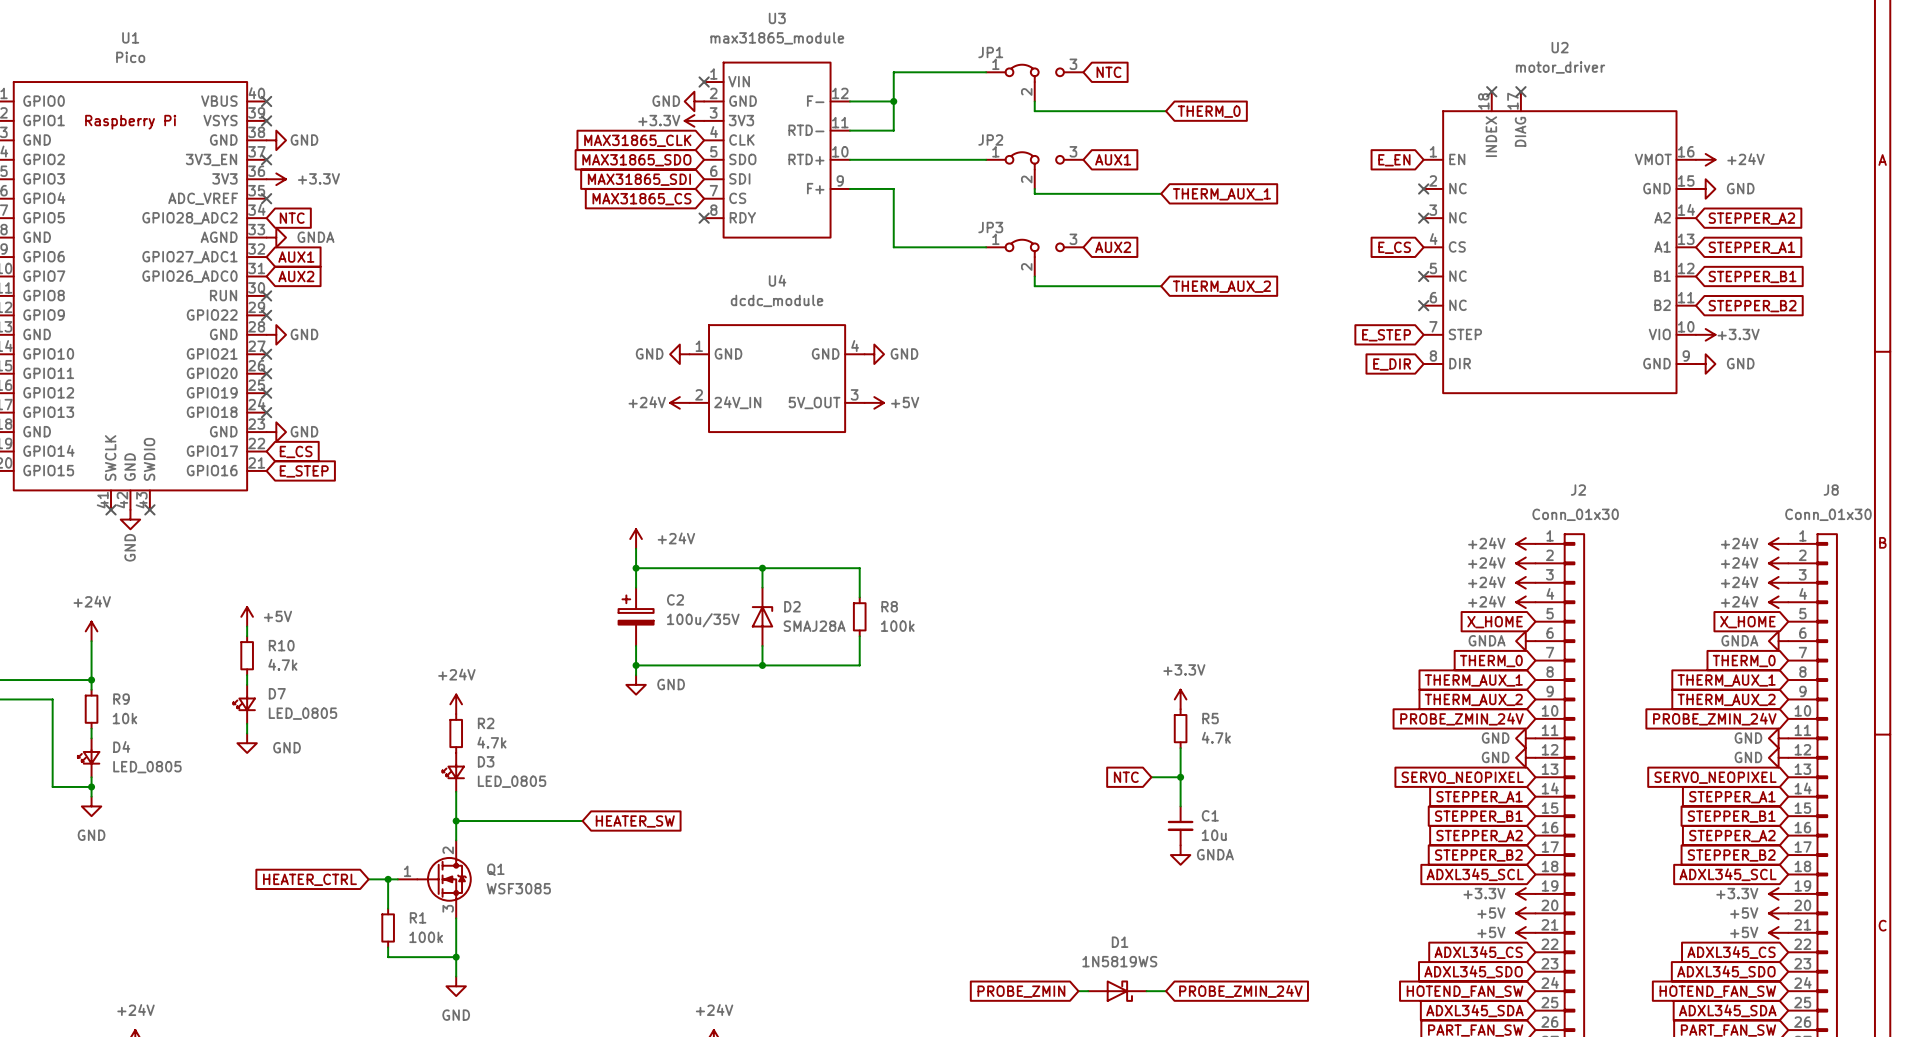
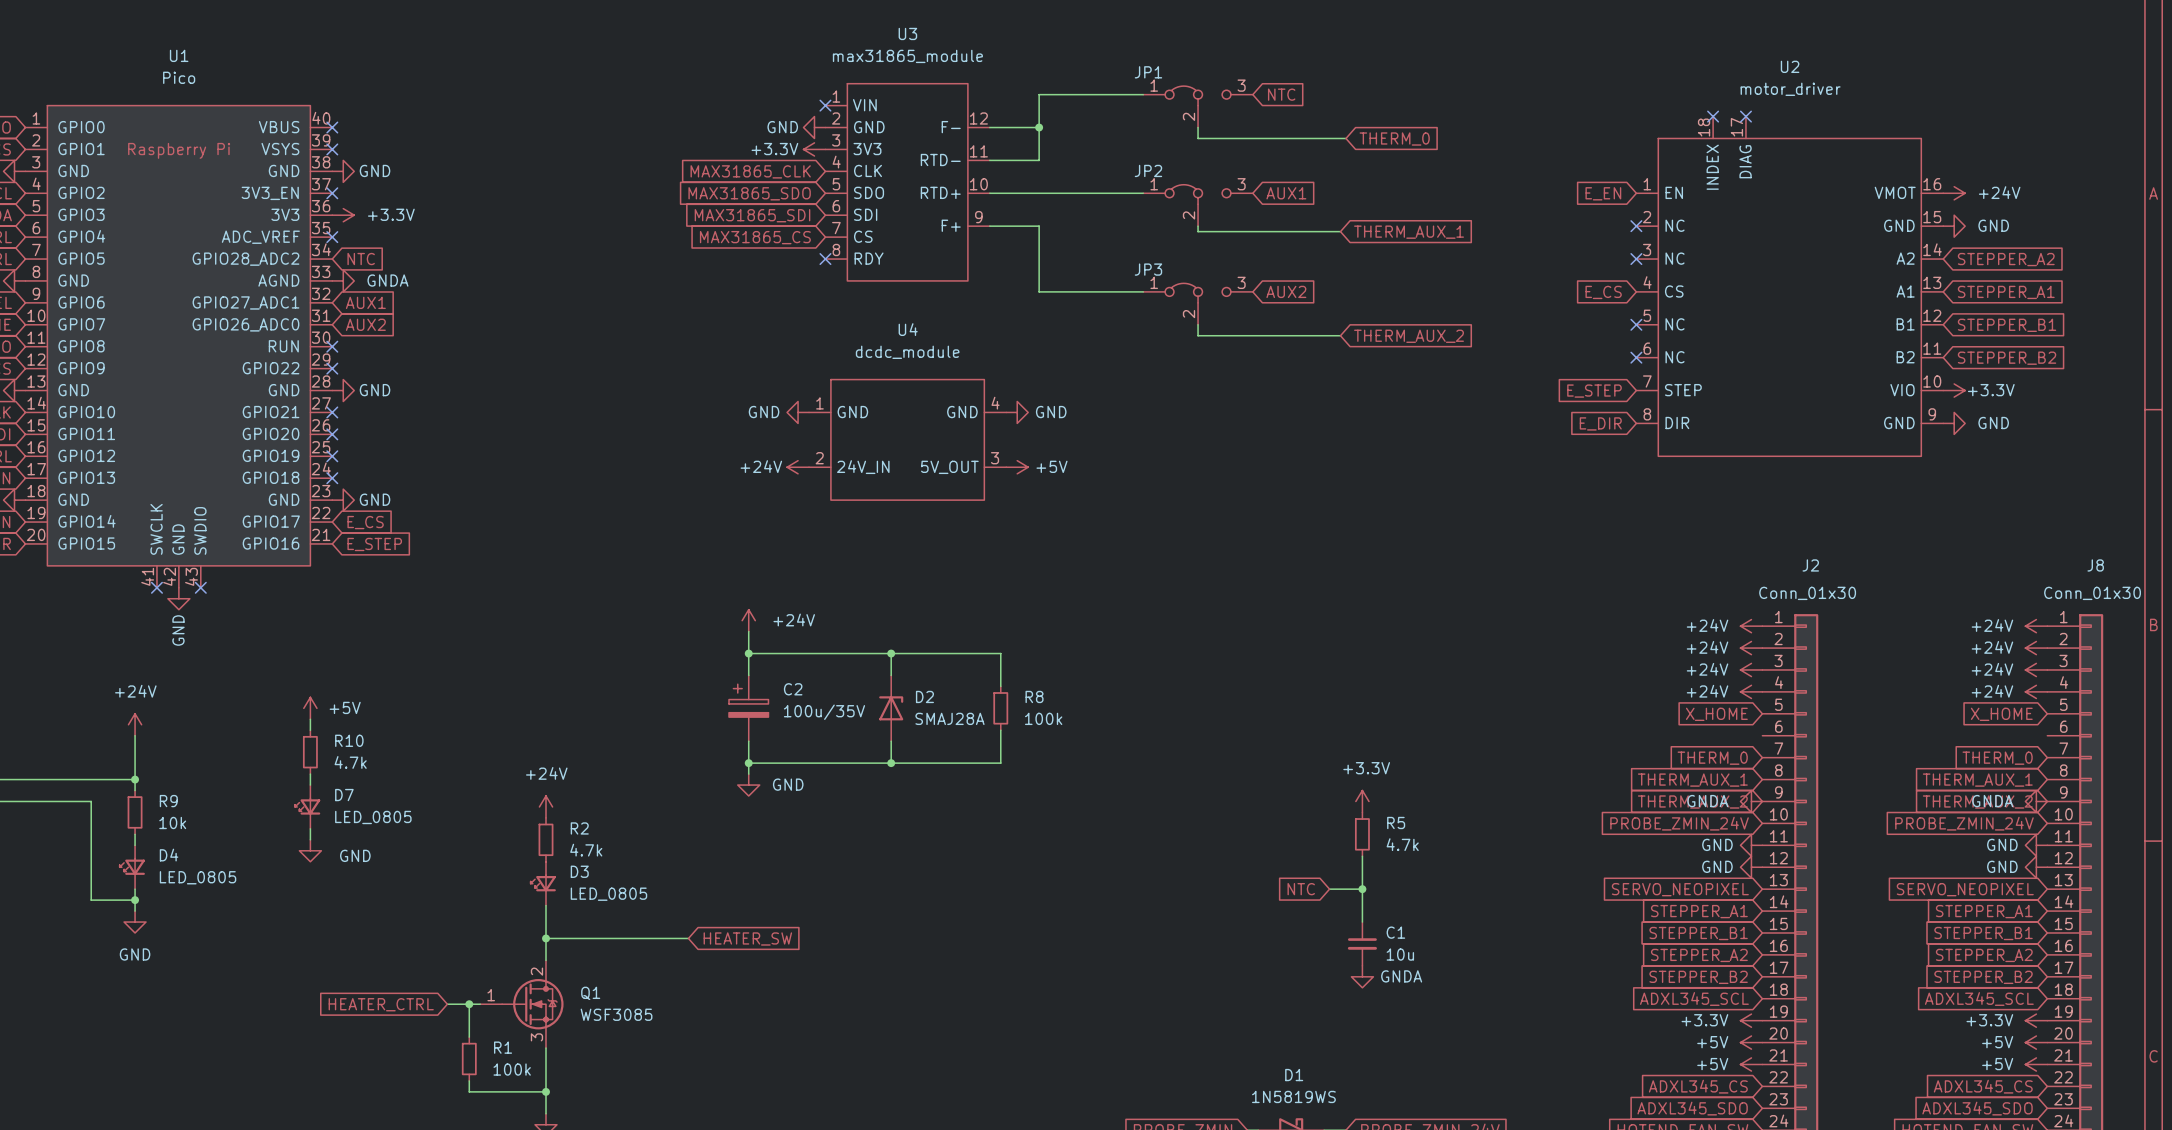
power symbol position: GNDA (1525, 641) -> GNDA (1751, 801)
power symbol position: GNDA (1778, 641) -> GNDA (2036, 801)

